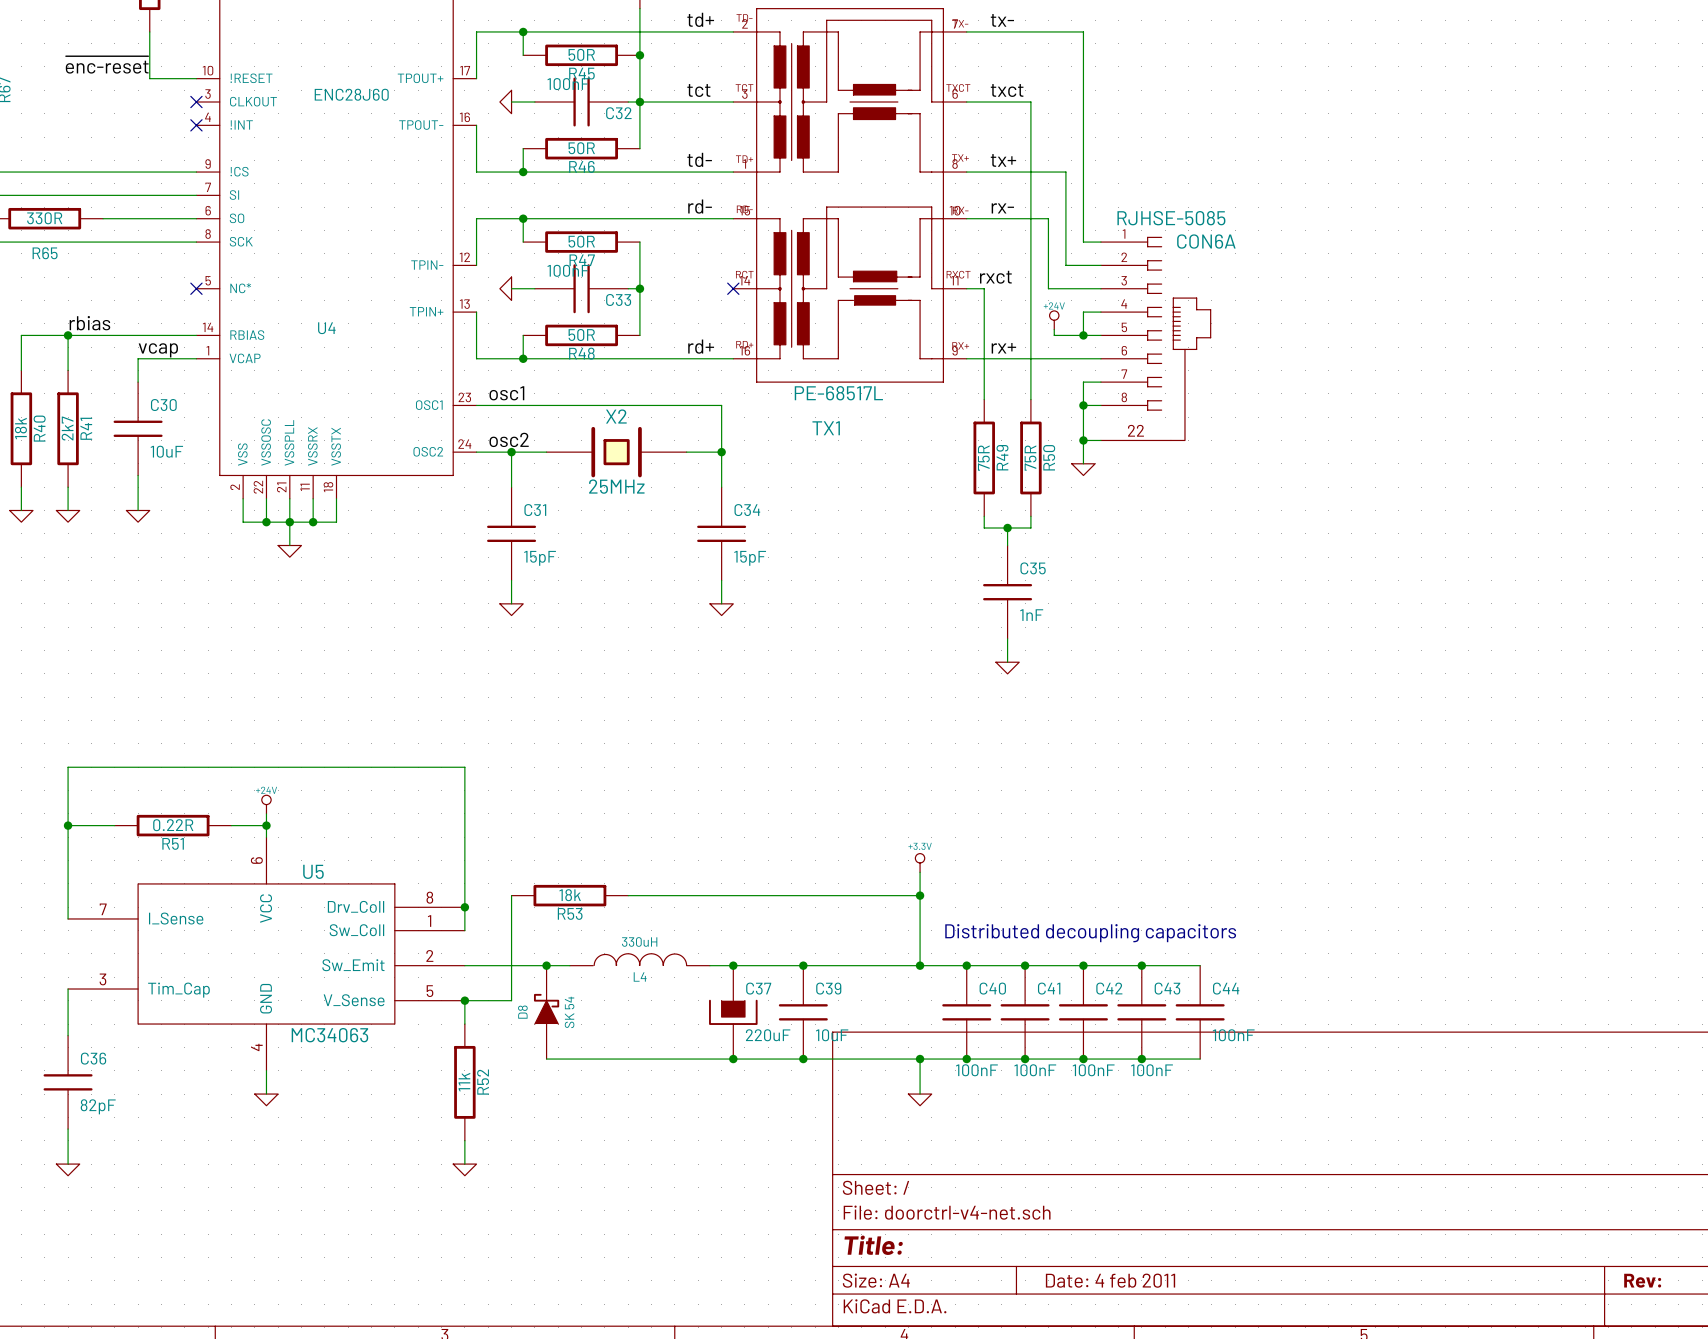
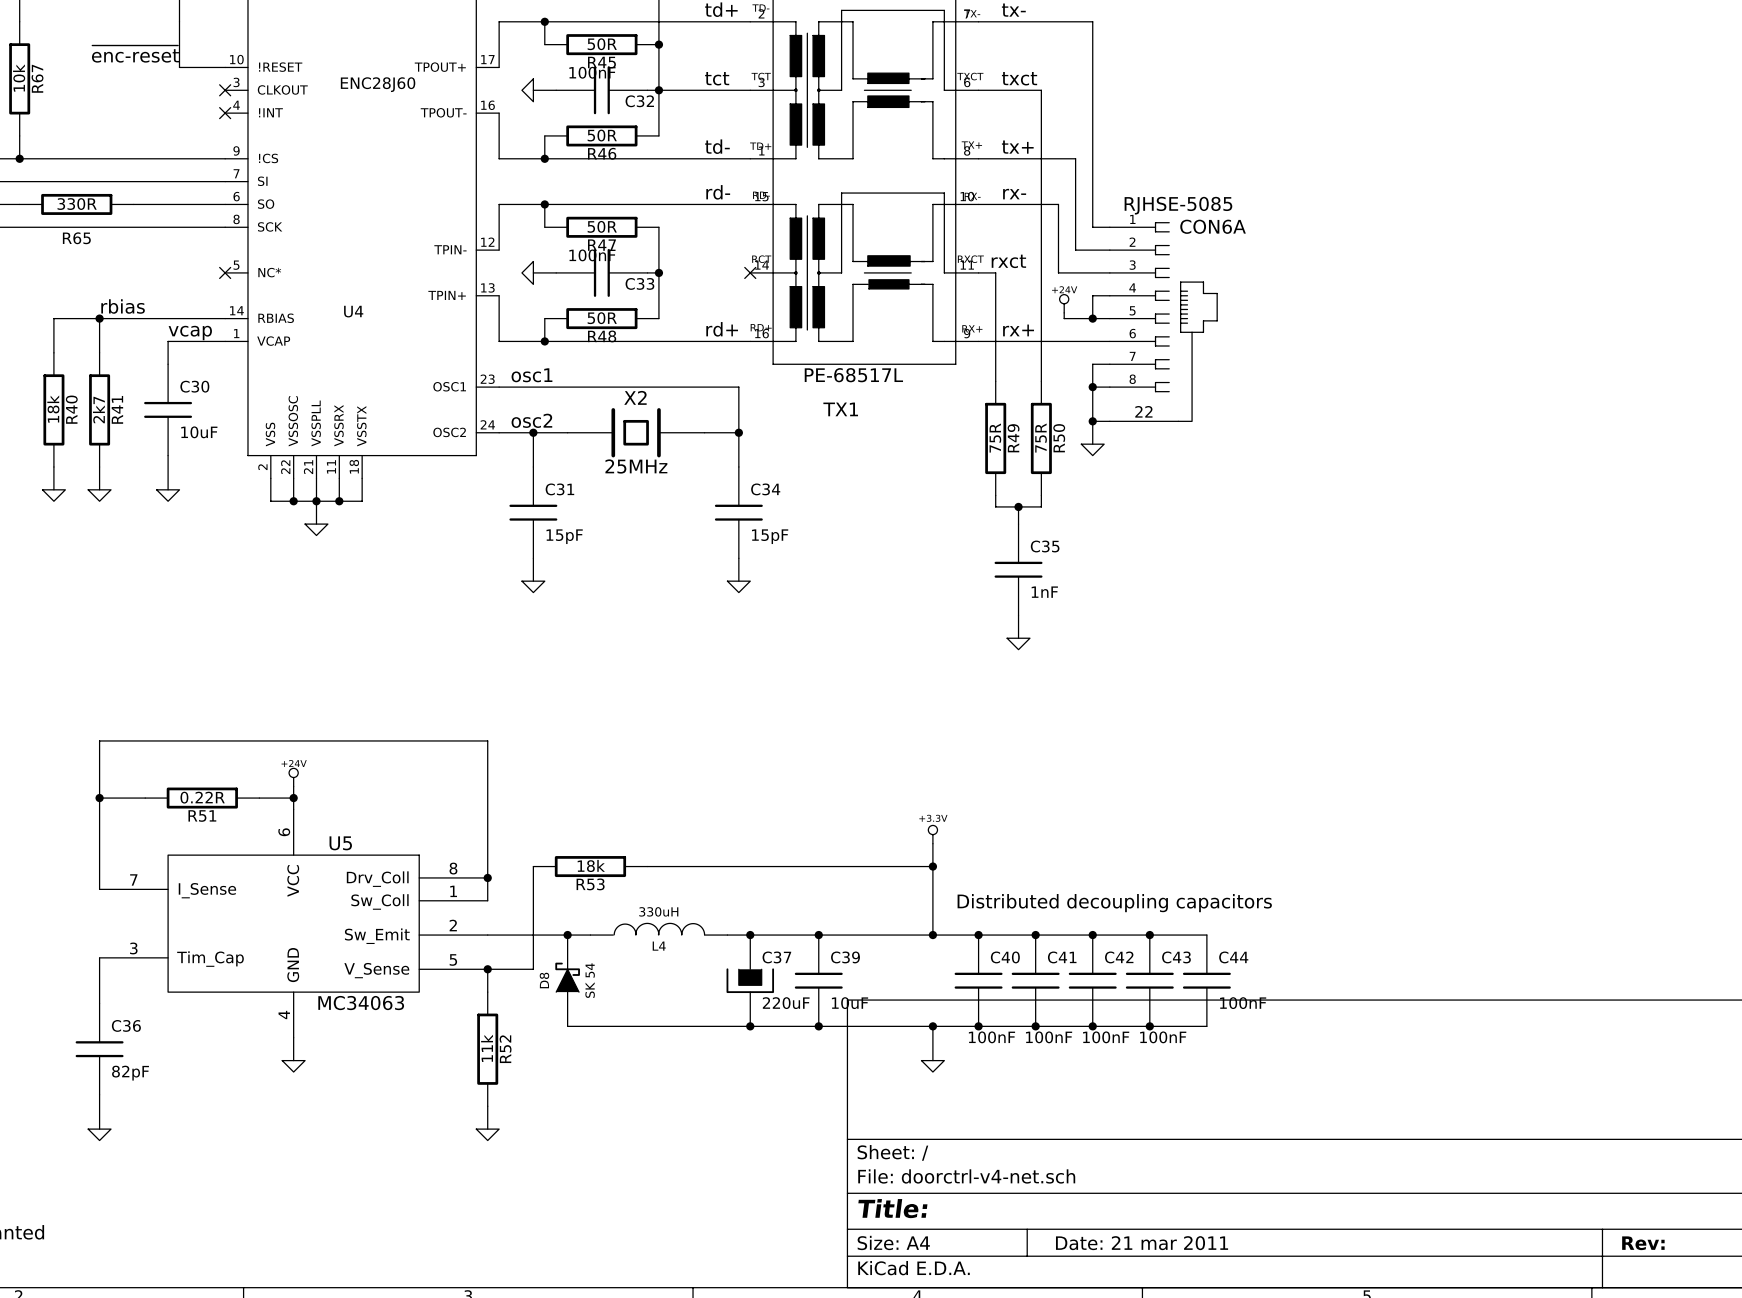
title block: Date: 4 feb 2011 (1110, 1280) -> Date: 21 mar 2011 (1142, 1243)

